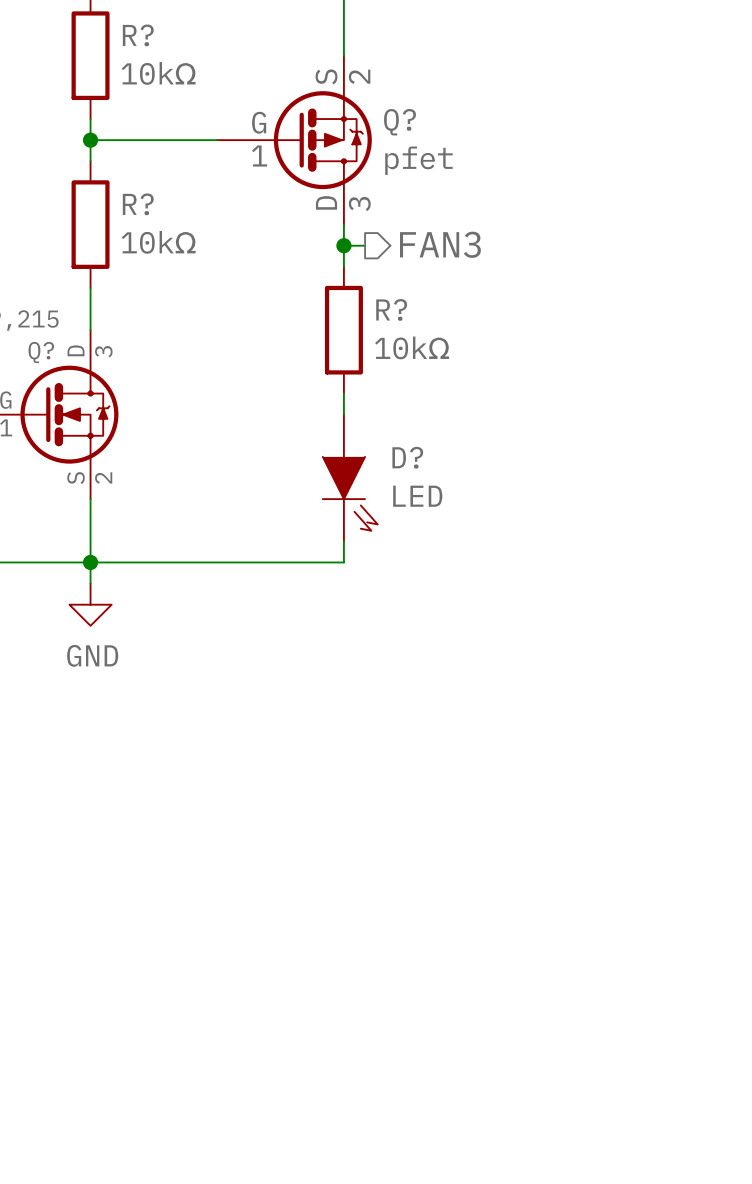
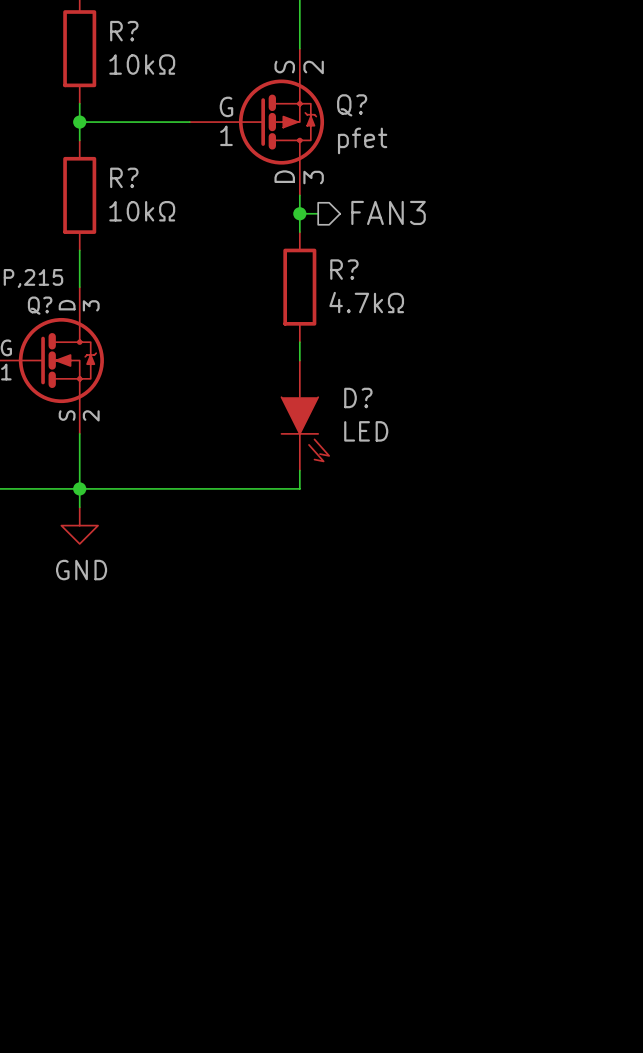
R? value: 10kΩ (412, 347) -> 4.7kΩ (366, 302)

